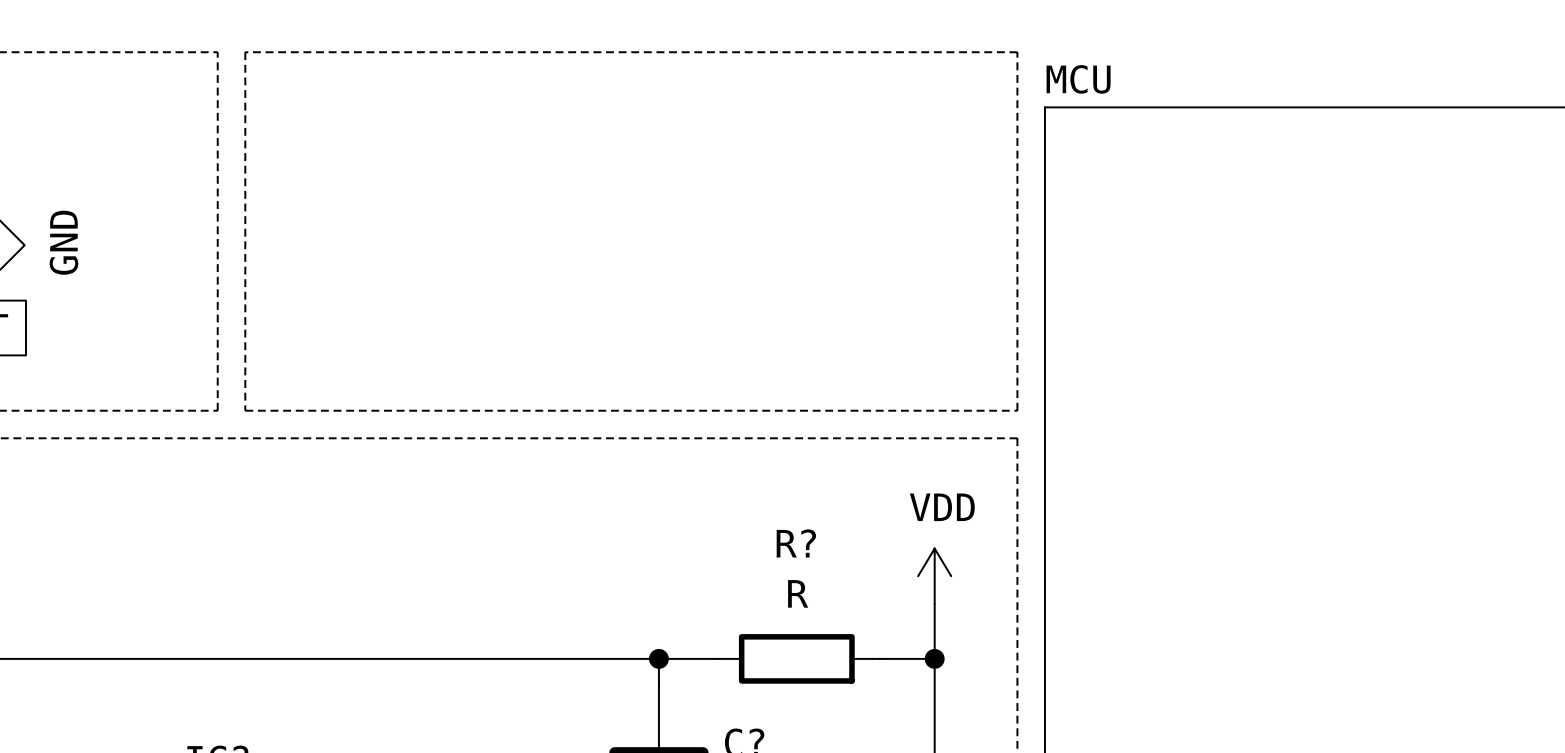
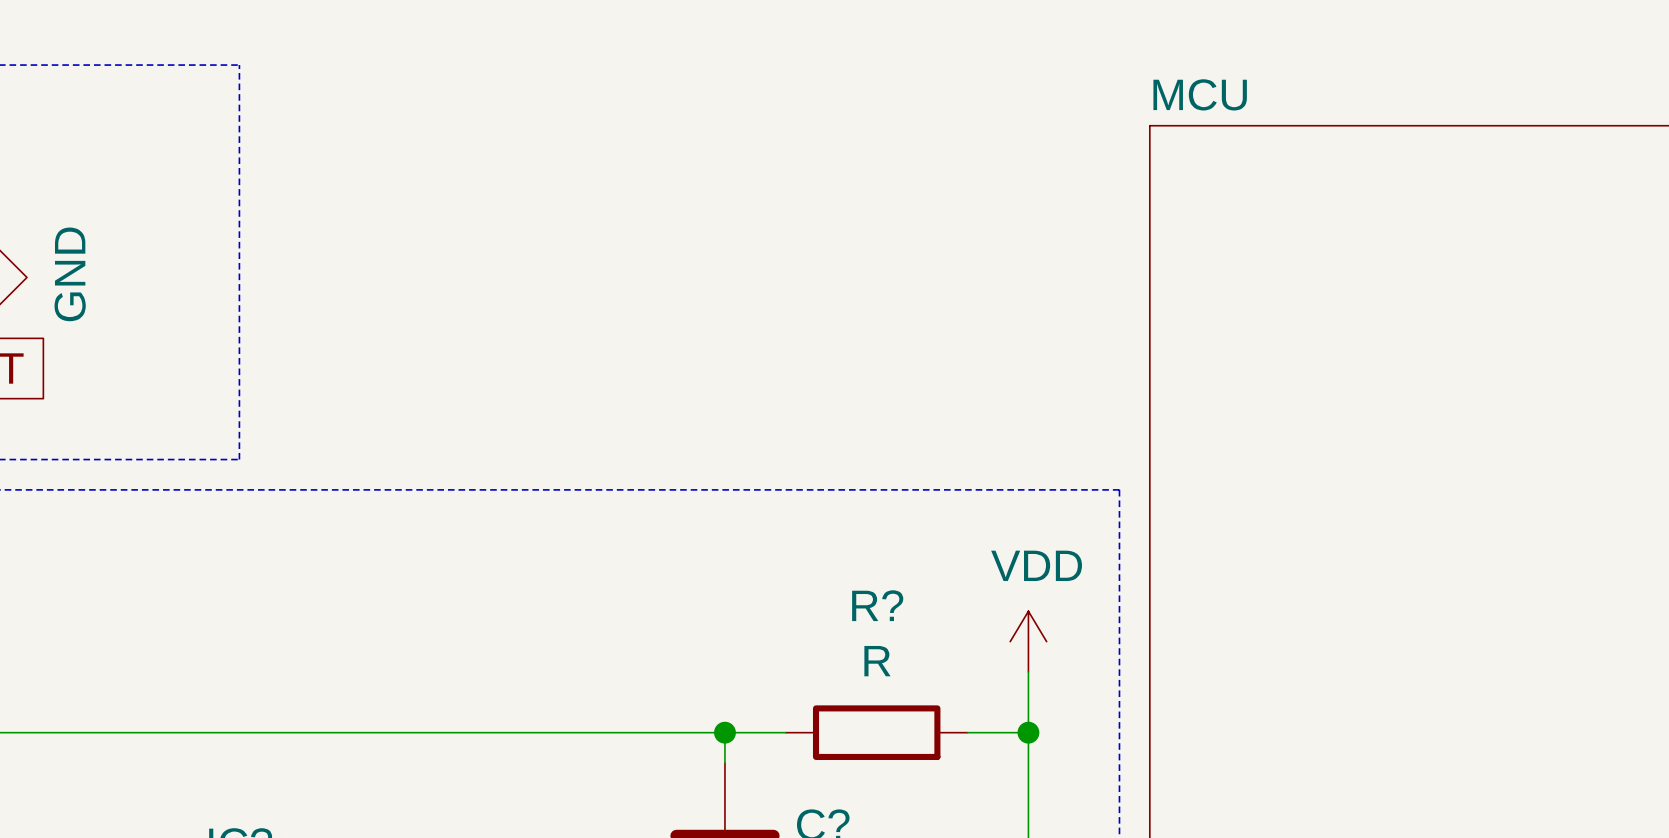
line: (245, 52) (245, 410) (1017, 410) (1017, 52) (245, 52) -> none

